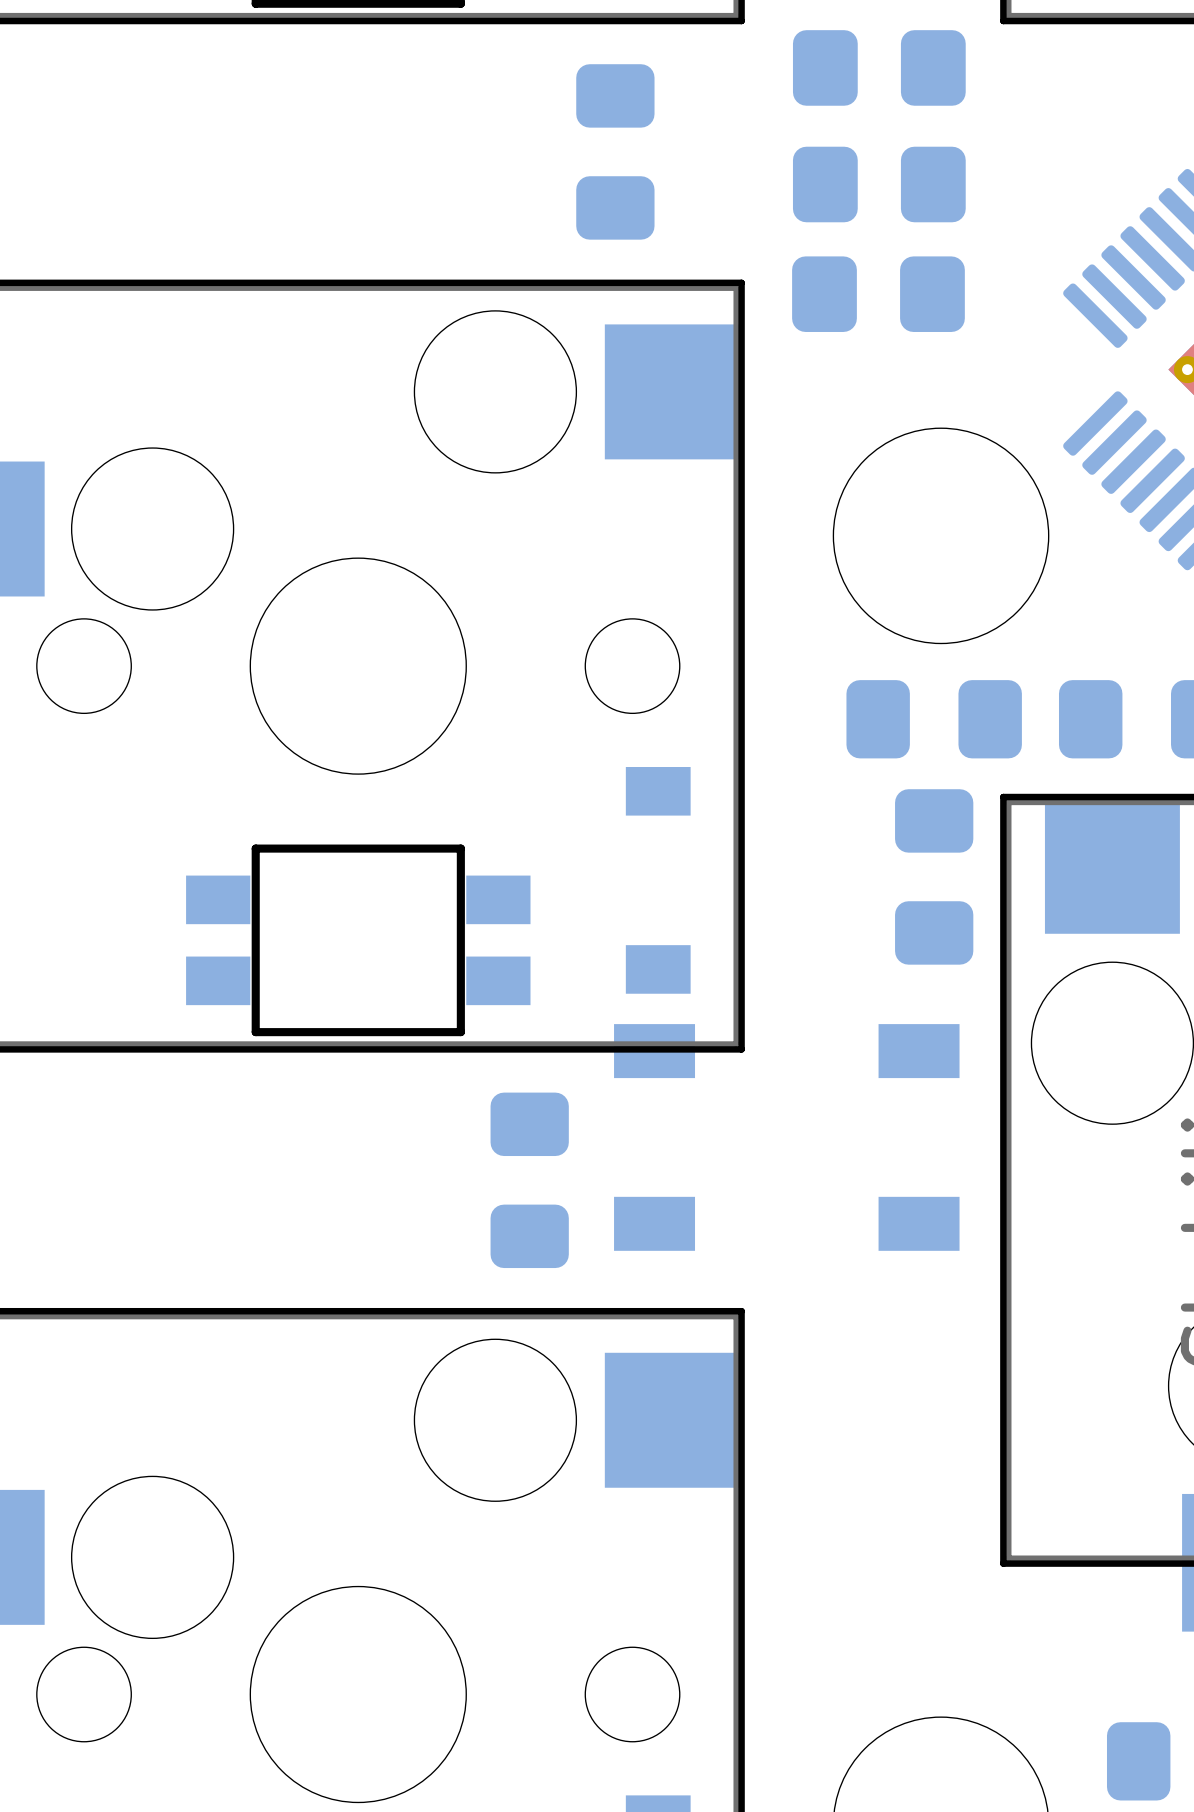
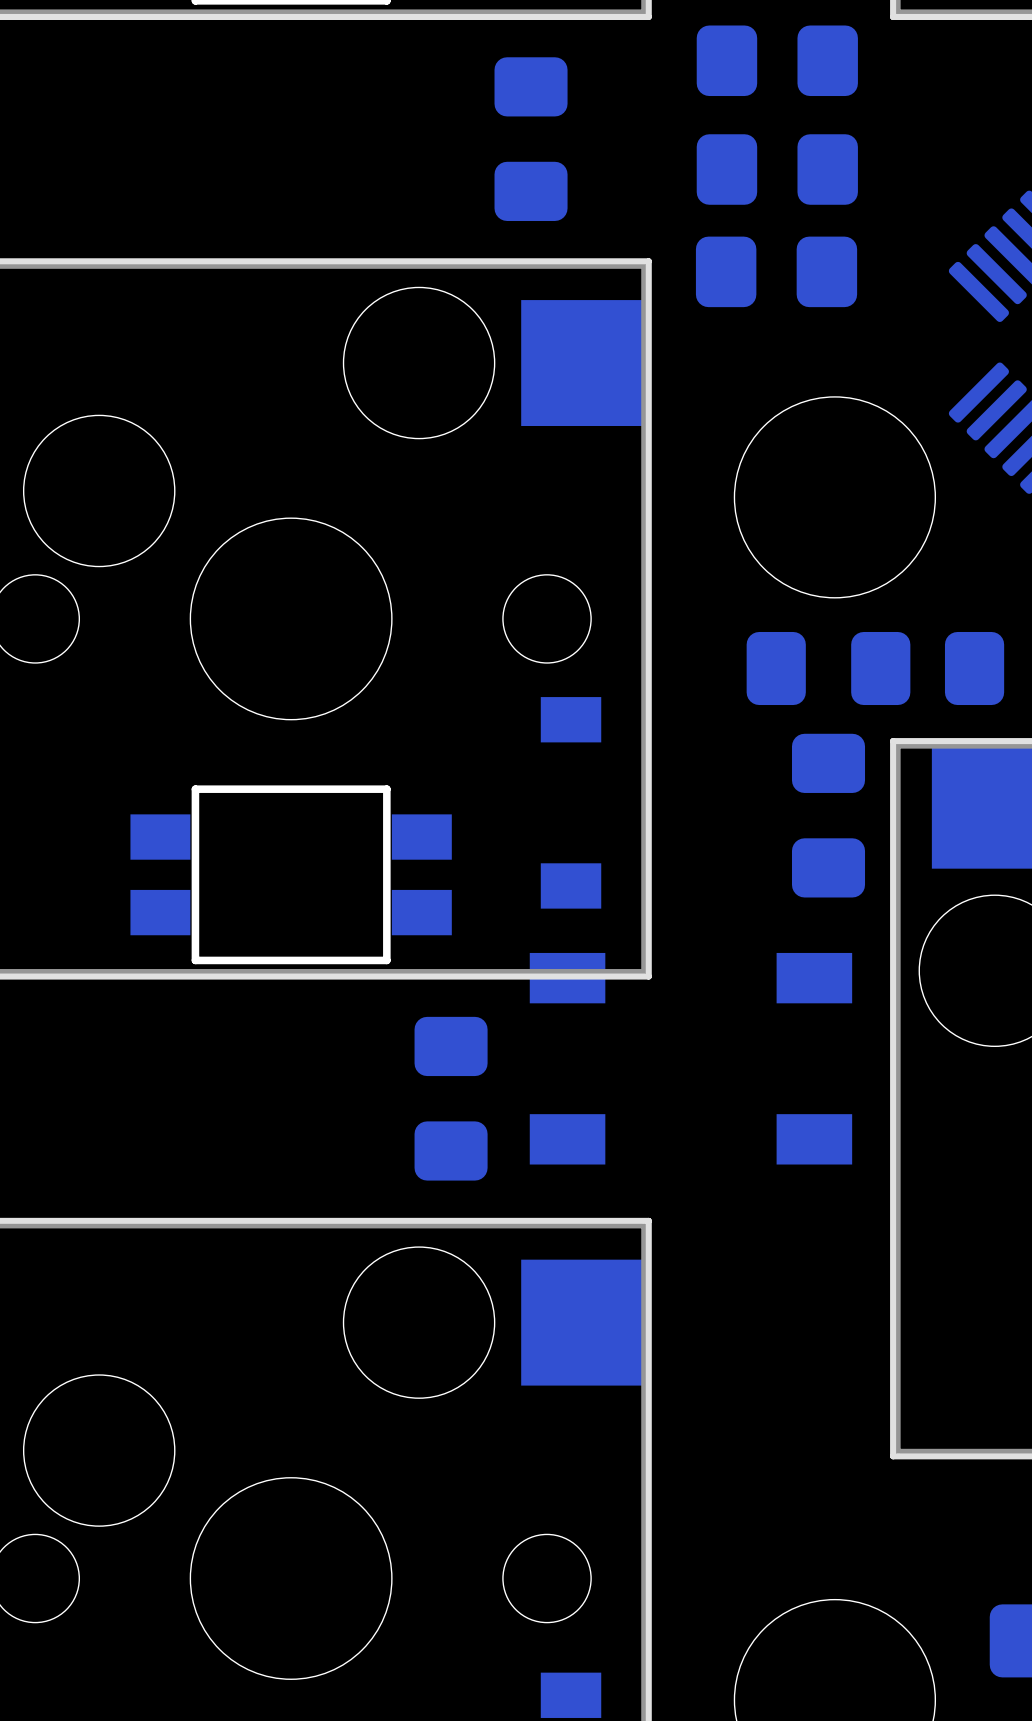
part position: (658, 880) -> (571, 802)

